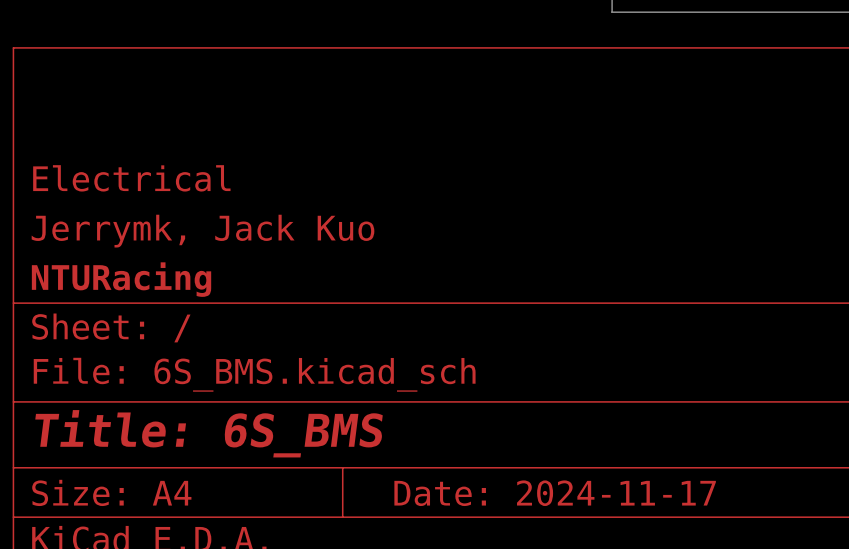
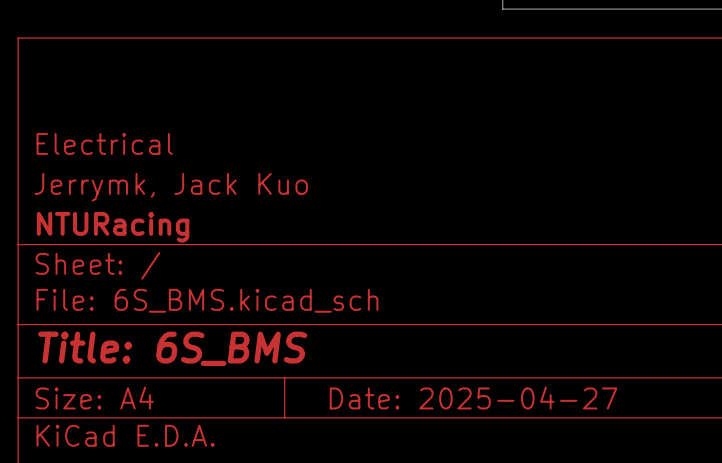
title block: Date: 2024-11-17 (555, 493) -> Date: 2025-04-27 (473, 397)

